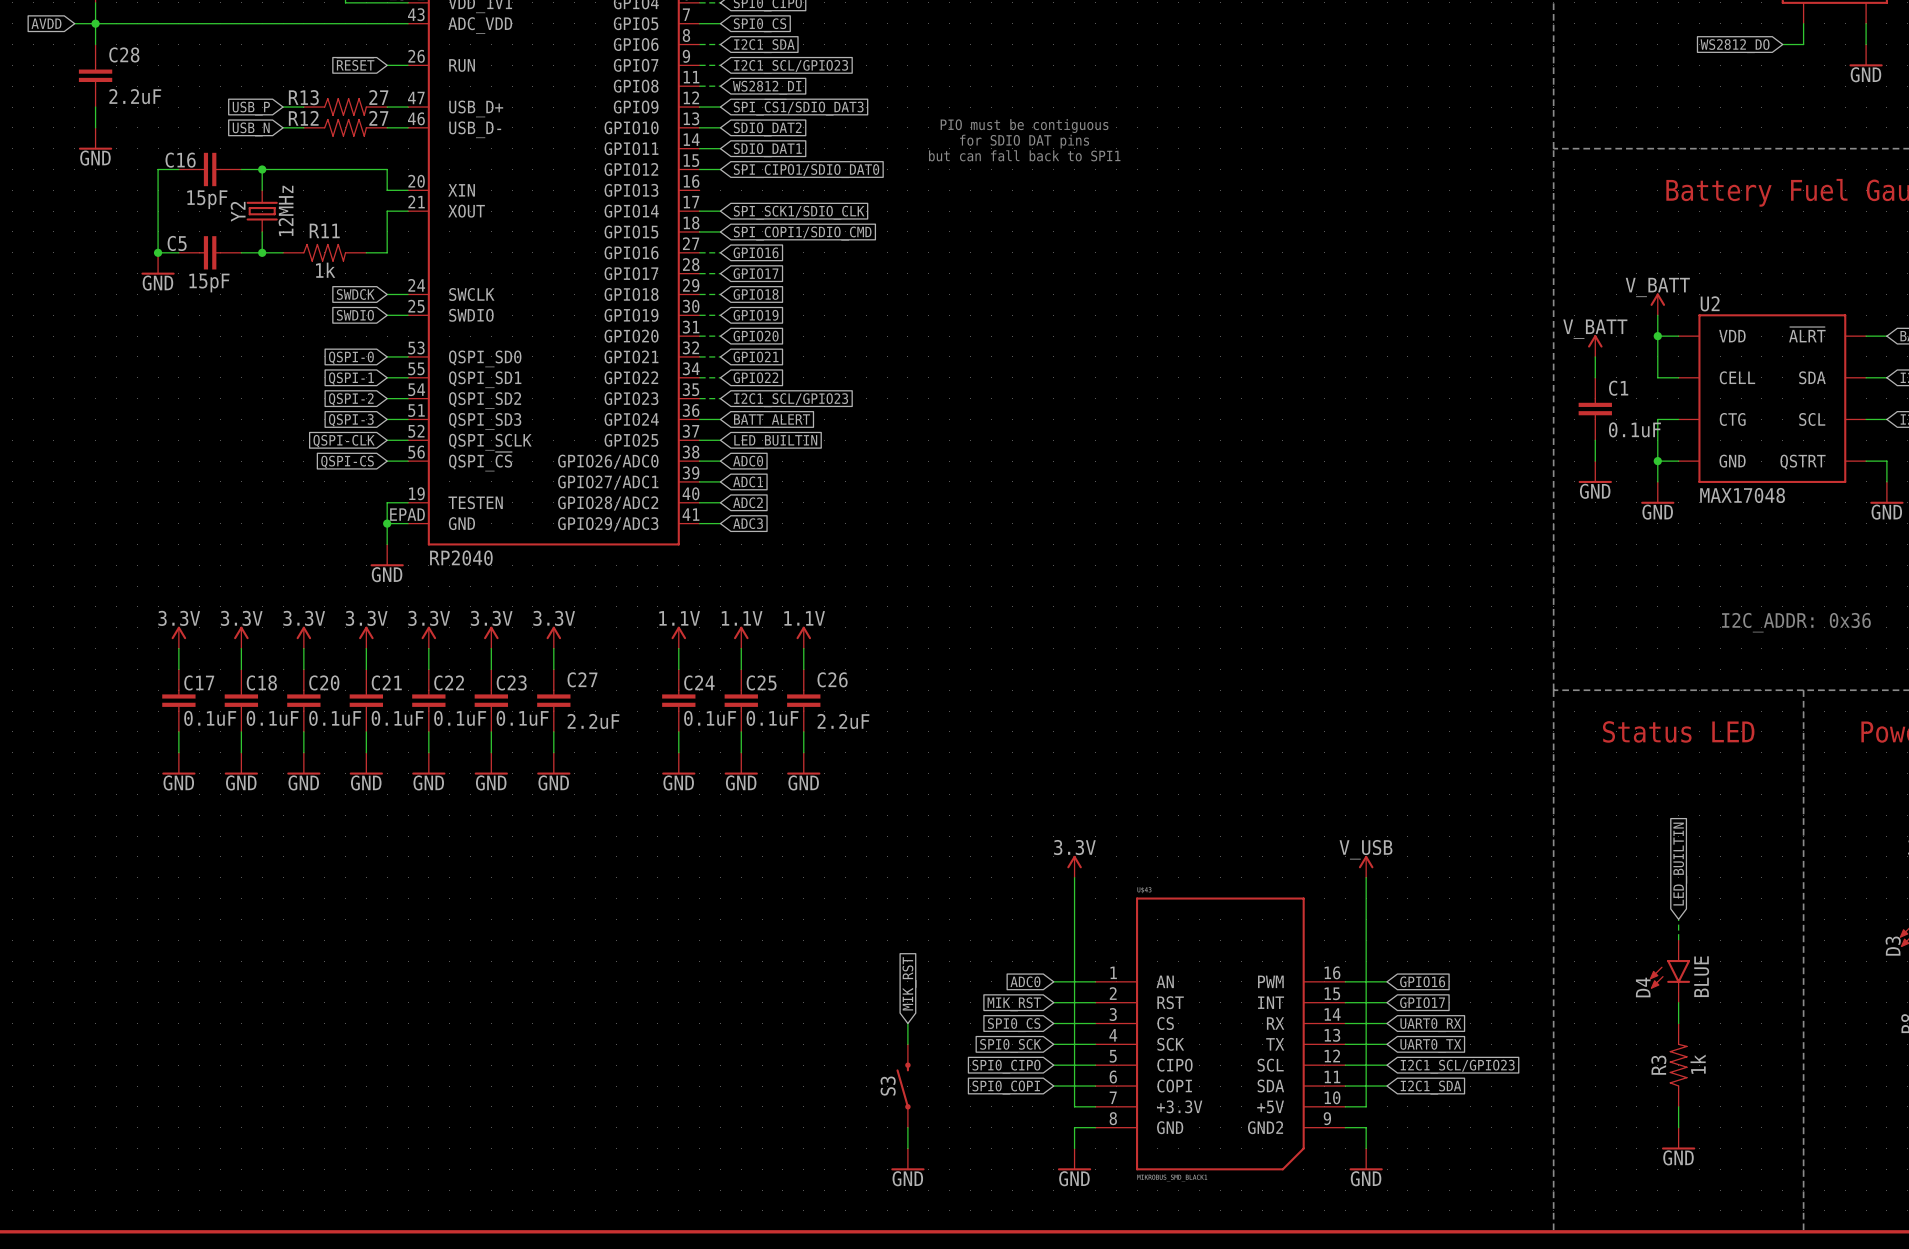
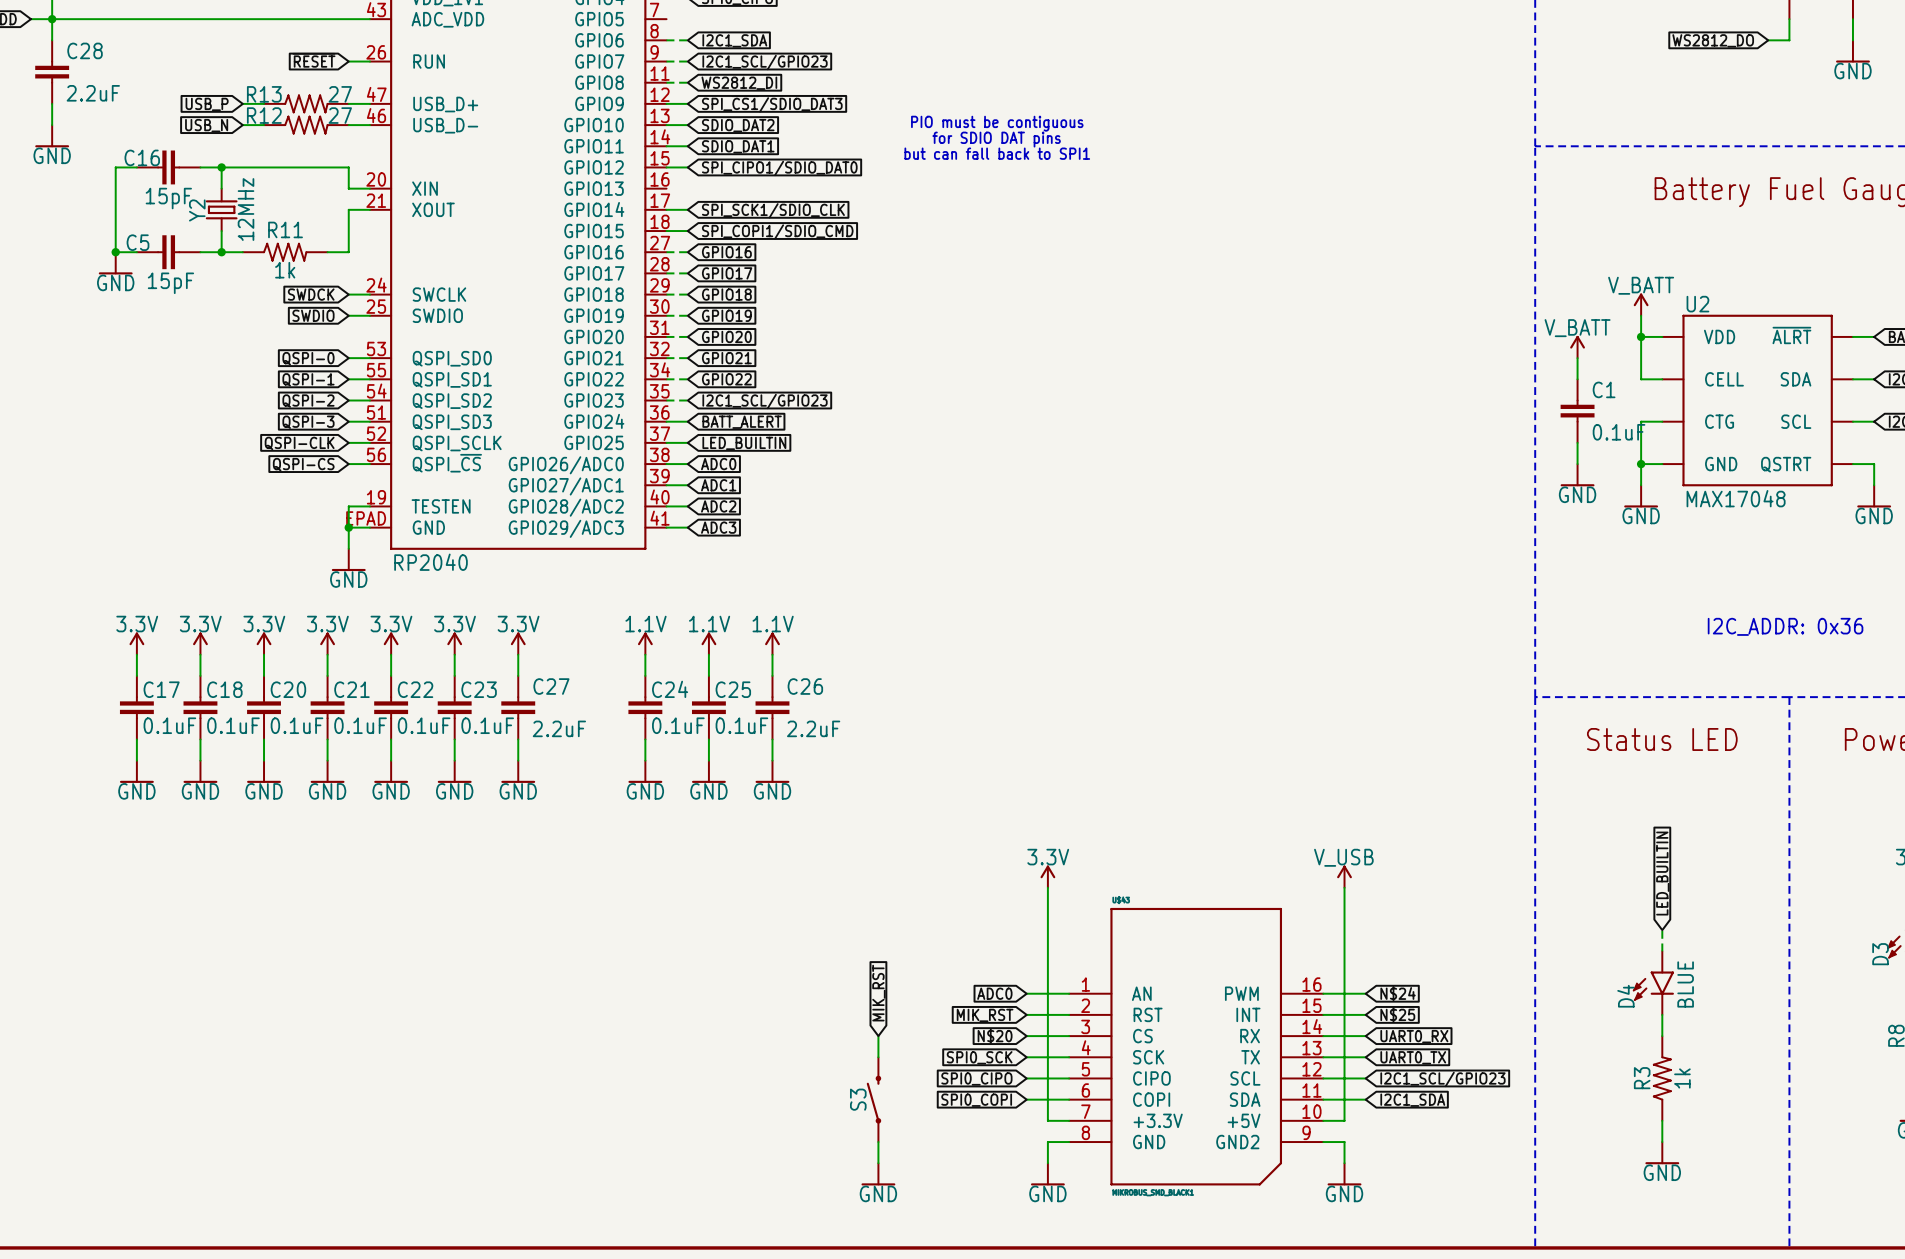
wire: (699, 23) (720, 23) -> none
global label: SPI0_CS (760, 25) -> none
global label: GPIO16 (1422, 981) -> N$24 (1398, 993)
global label: GPIO17 (1422, 1002) -> N$25 (1397, 1014)
global label: SPI0_CS (1014, 1025) -> N$20 (995, 1036)

